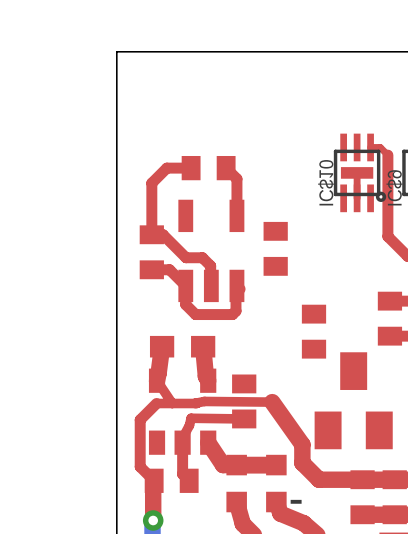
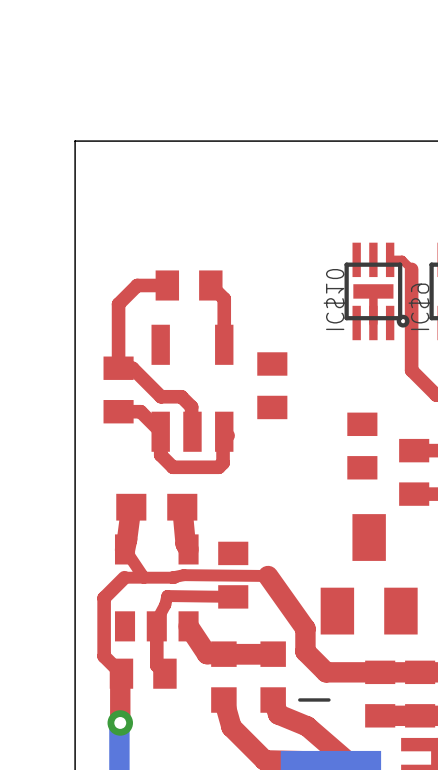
part position: (313, 331) -> (362, 446)

